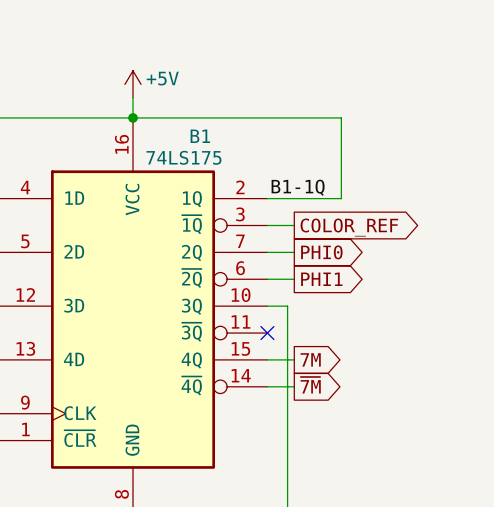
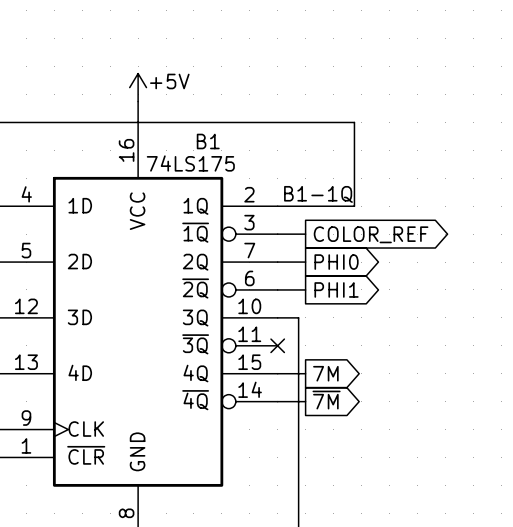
junction: (133, 117) -> none

